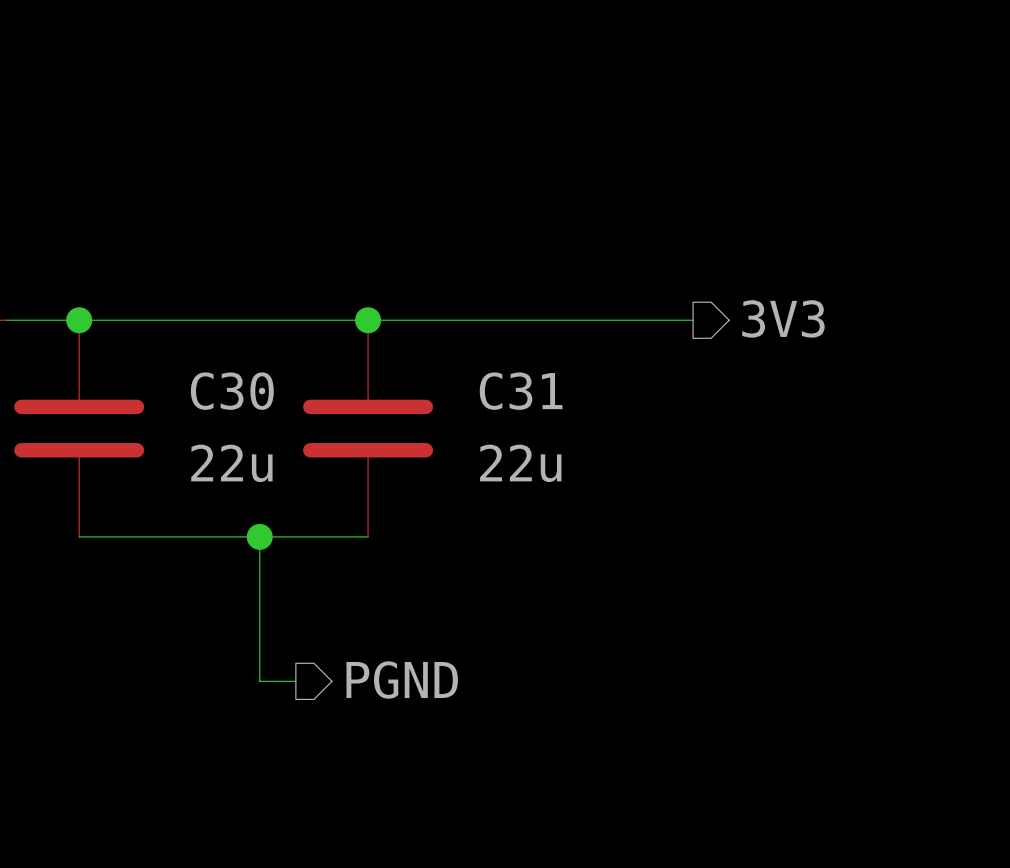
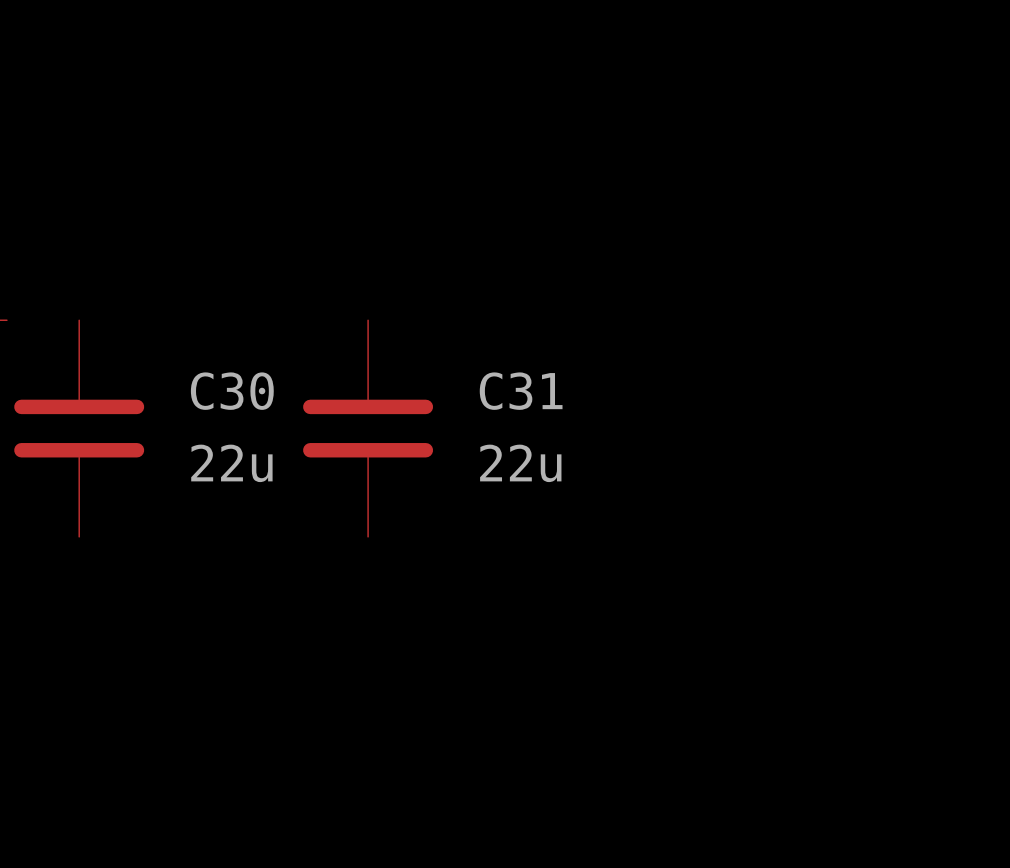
hierarchical label: 3V3 (783, 318) -> none
wire: (6, 320) (693, 320) -> none
junction: (79, 320) -> none
junction: (368, 320) -> none
wire: (79, 536) (368, 536) -> none
wire: (259, 536) (259, 681) (295, 681) -> none
junction: (259, 536) -> none
hierarchical label: PGND (402, 680) -> none

